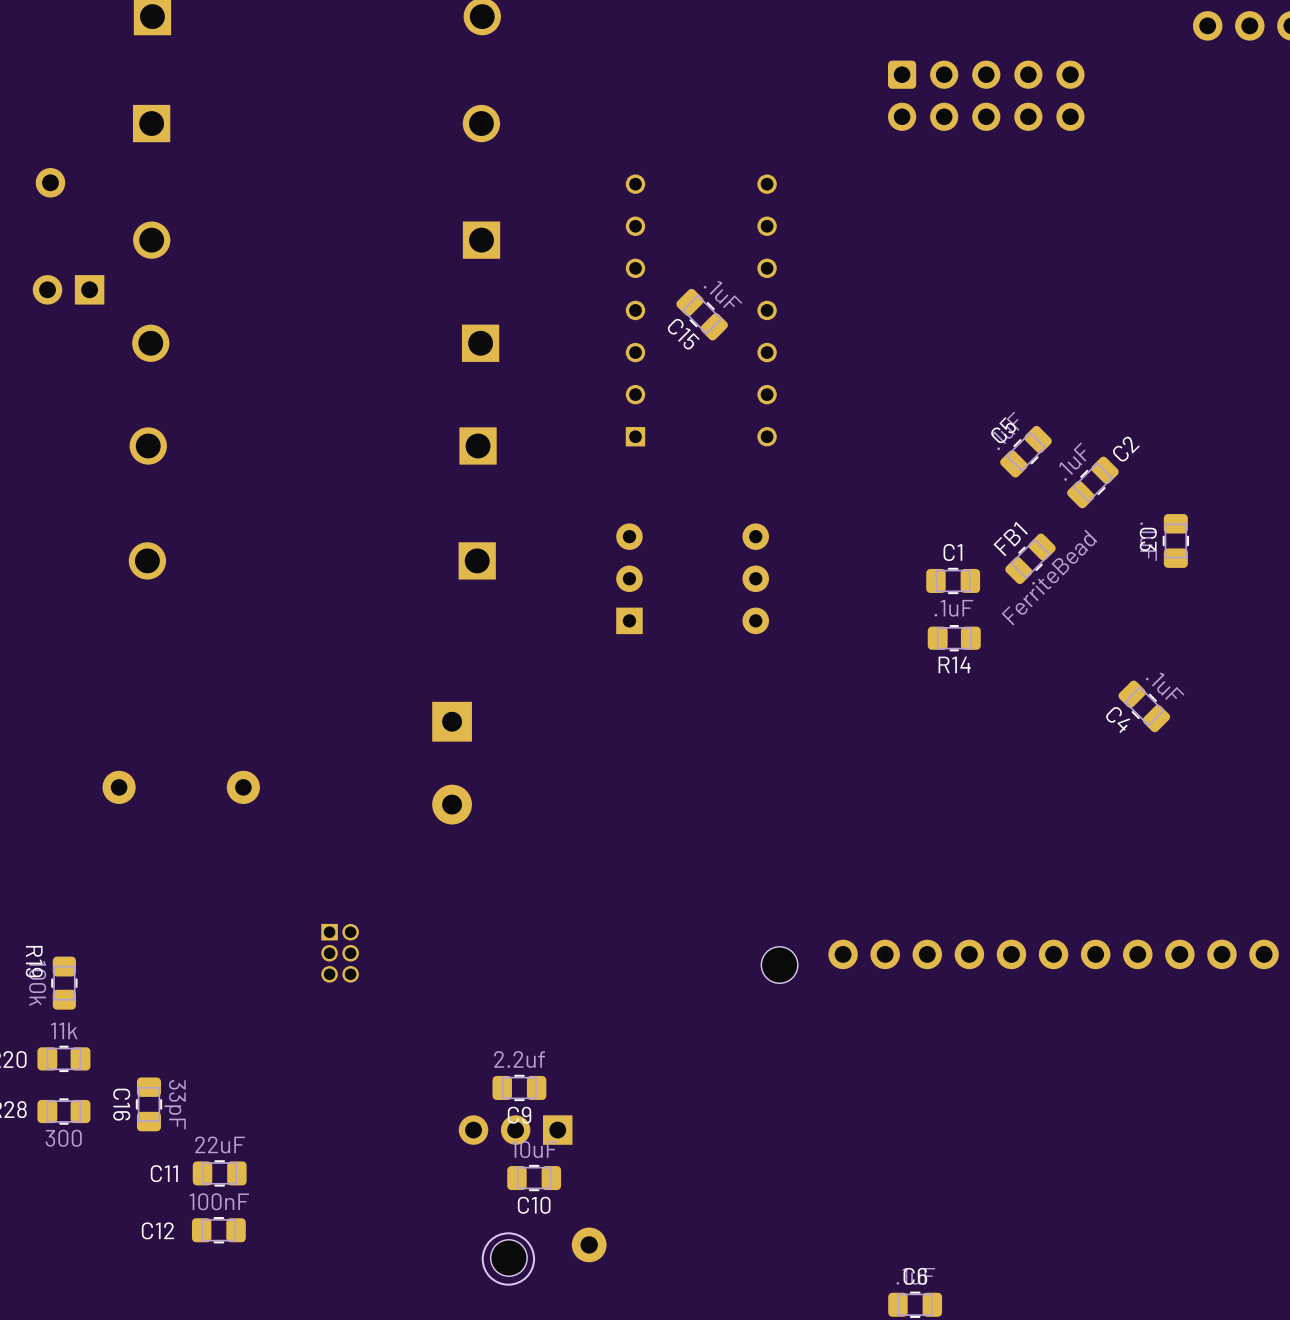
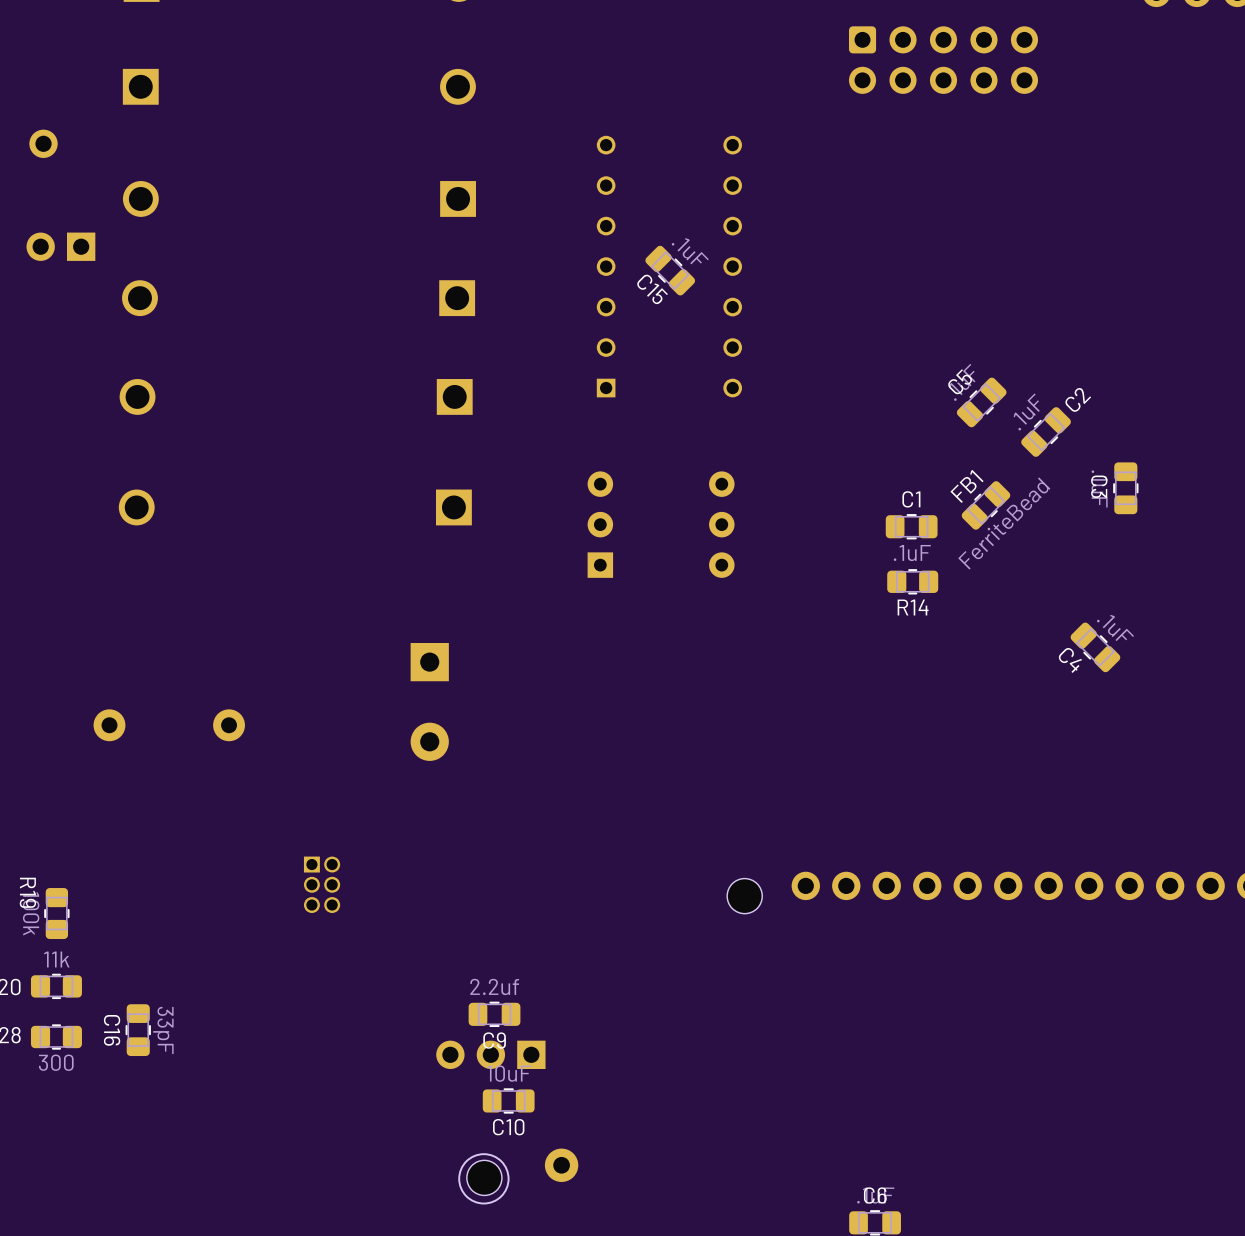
C11: 22uF (219, 1173) -> none
C12: 100nF (218, 1230) -> none

